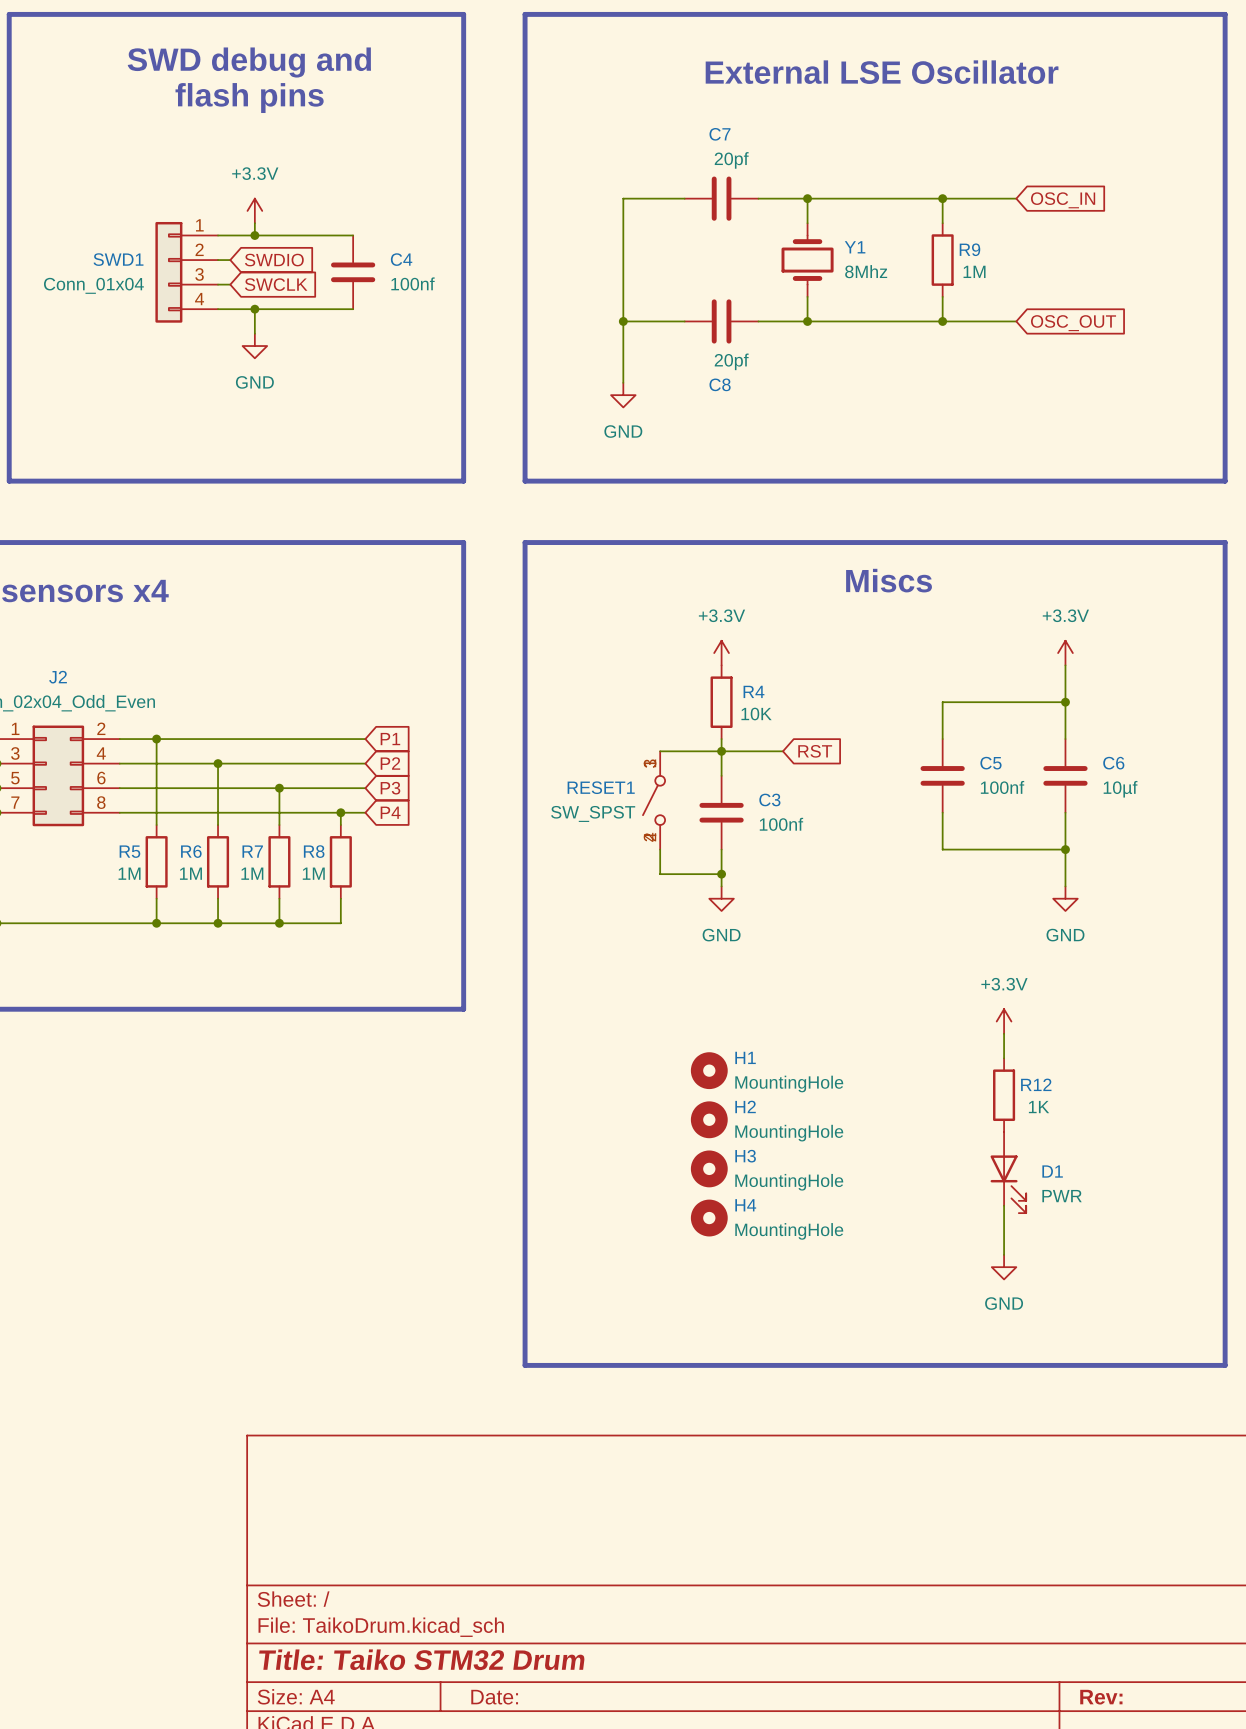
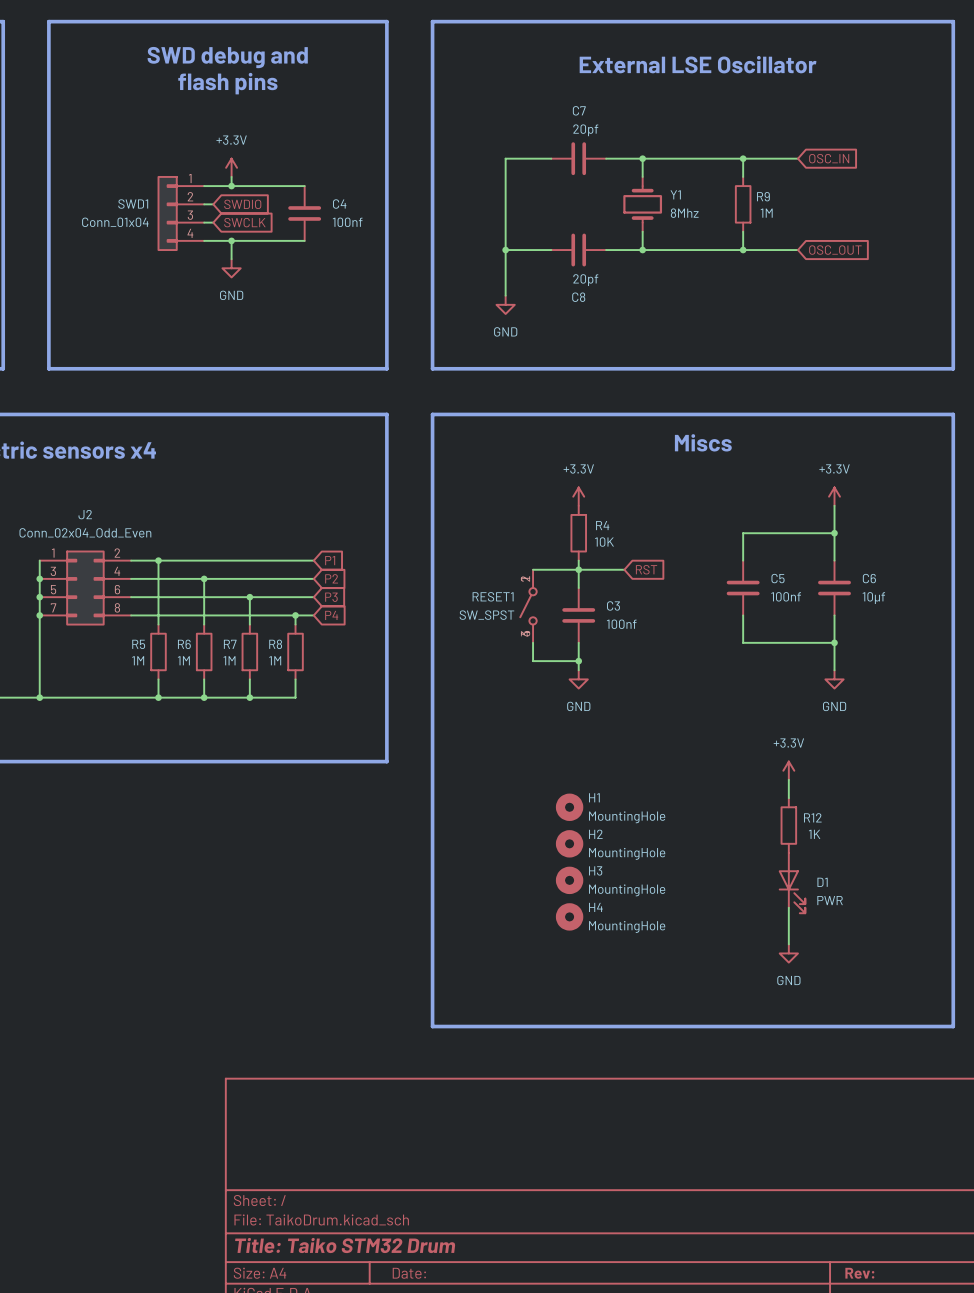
RESET1 symbol: [642, 751, 666, 850] -> [520, 569, 537, 643]

